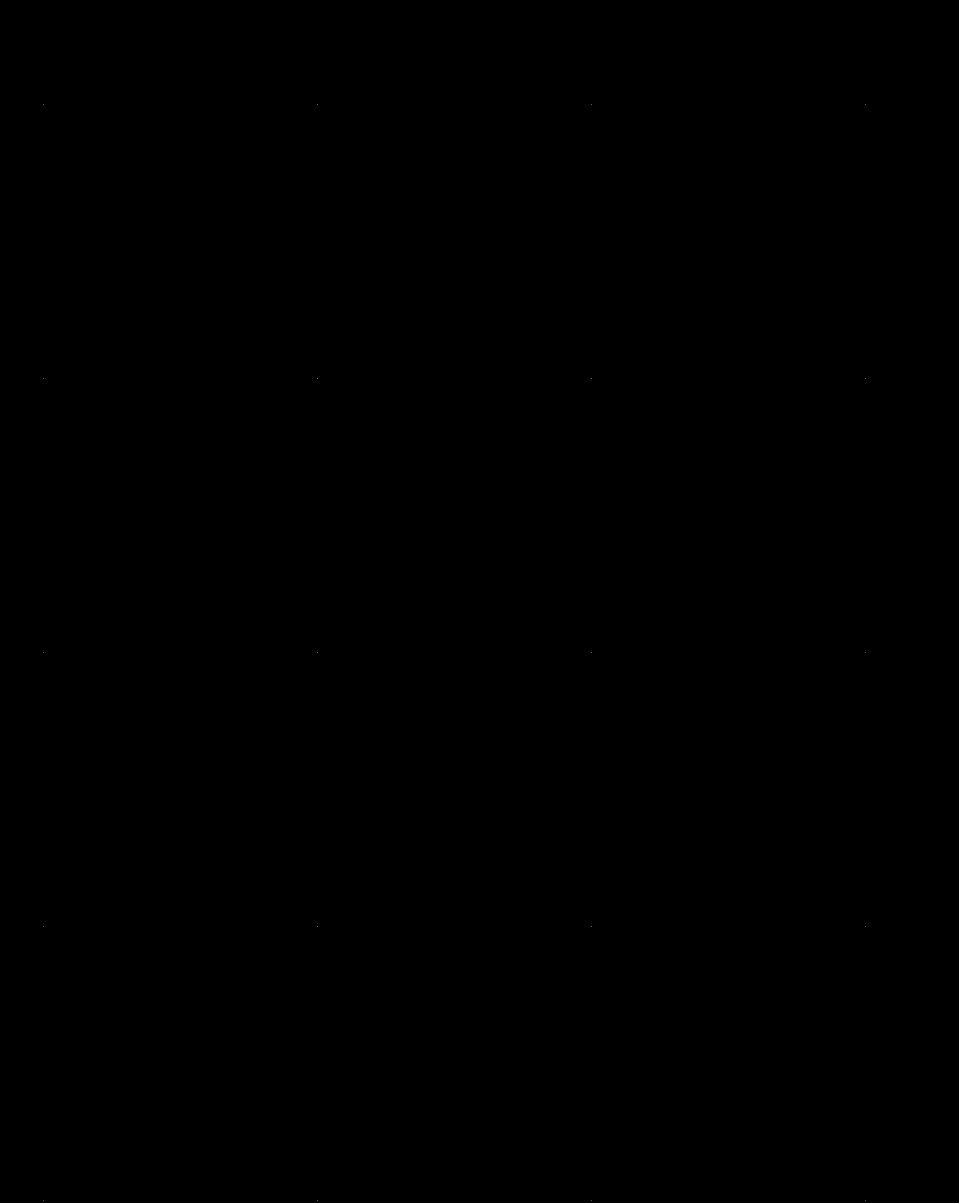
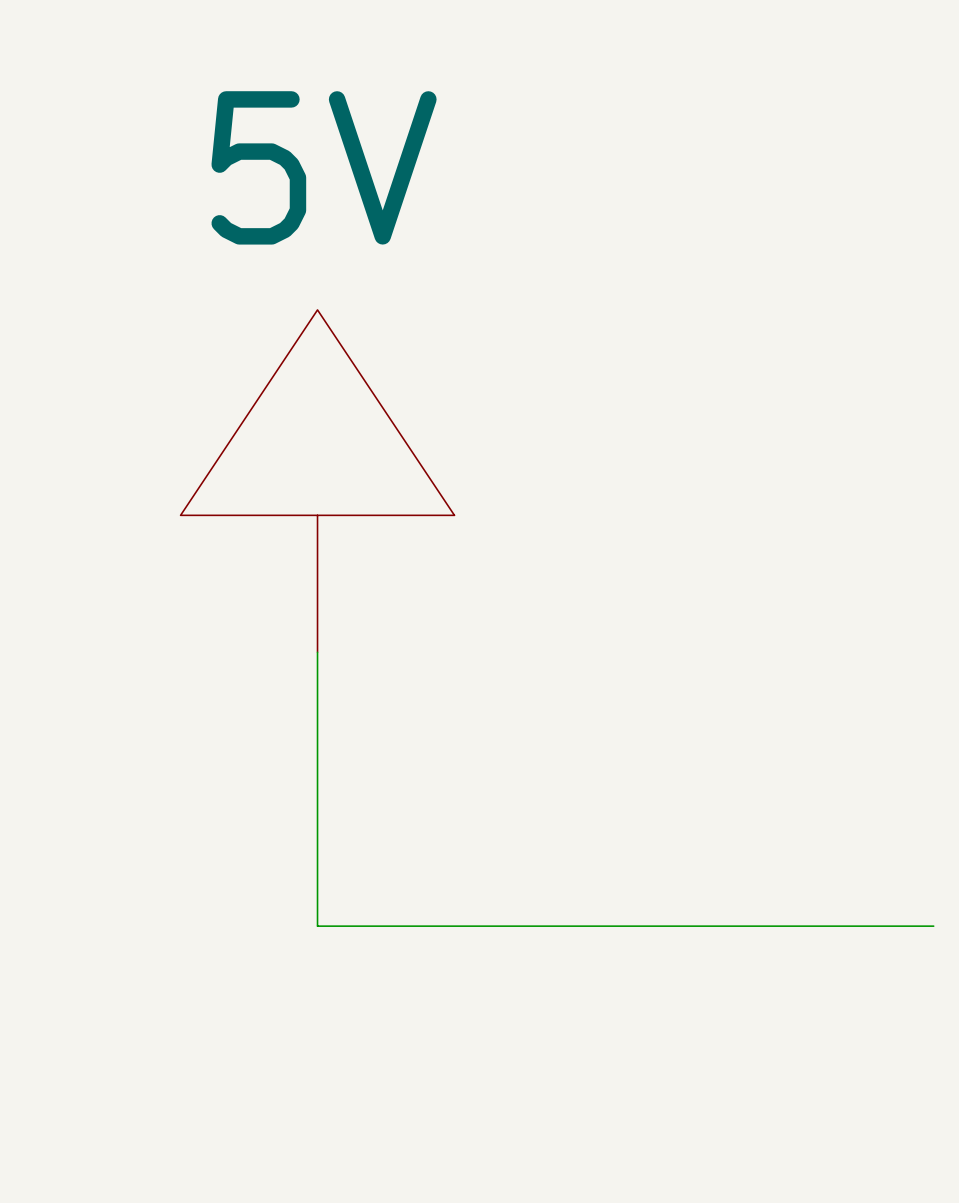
power symbol: none -> 5V (317, 481)
wire: none -> (317, 652) (317, 926) (933, 926)

